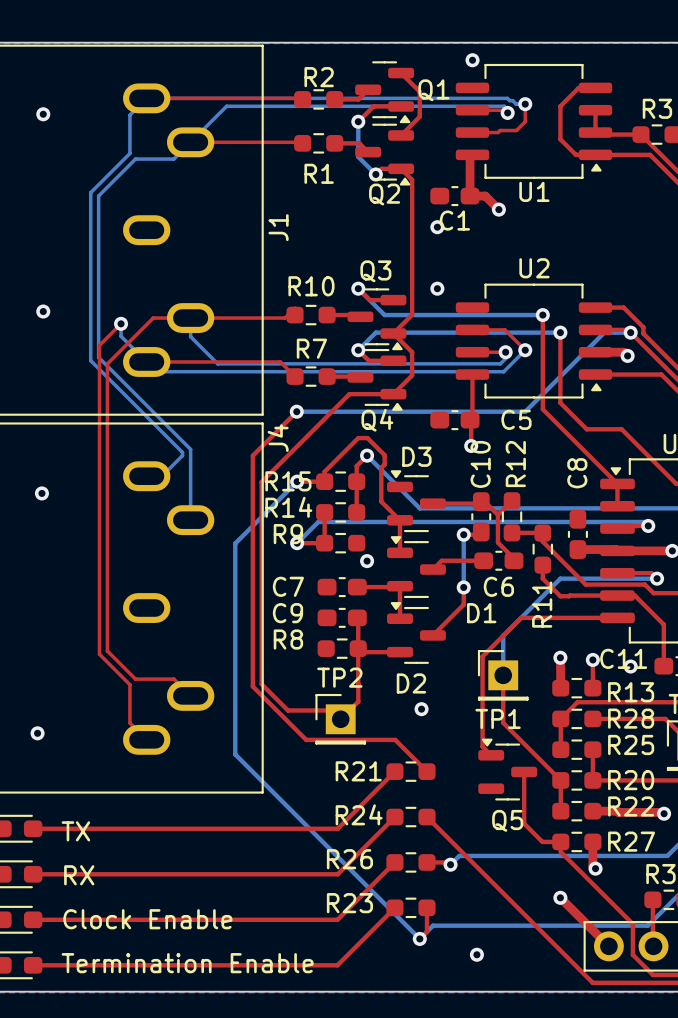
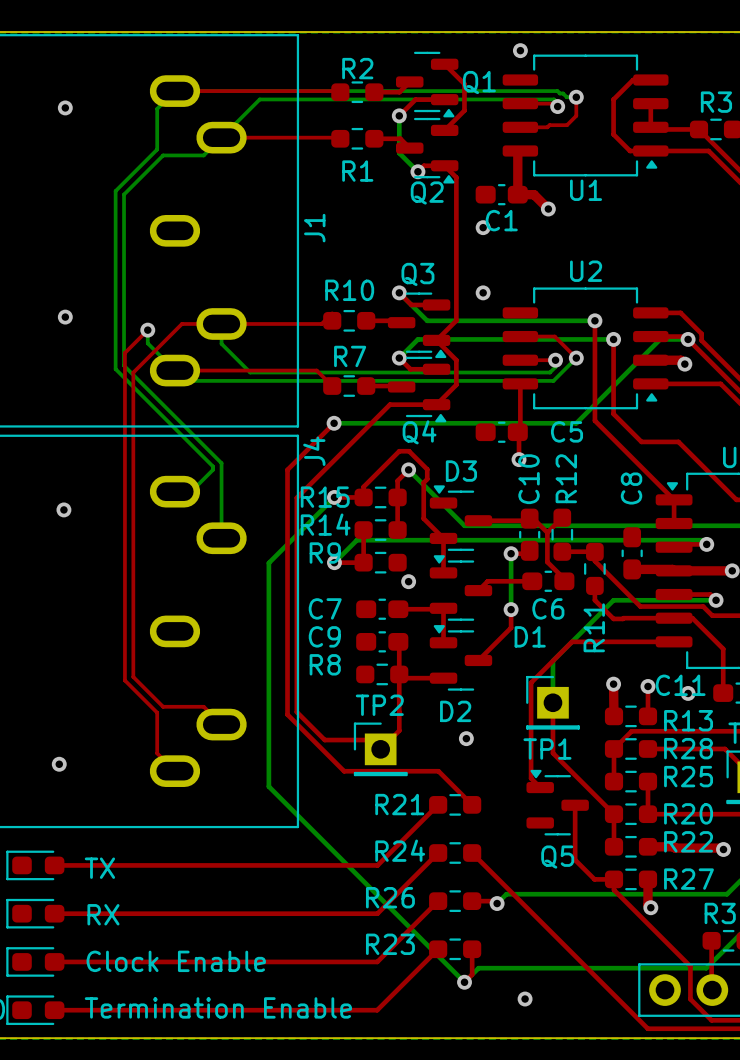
top track: (560, 897) (608, 946) -> none
via: (560, 897) -> none

